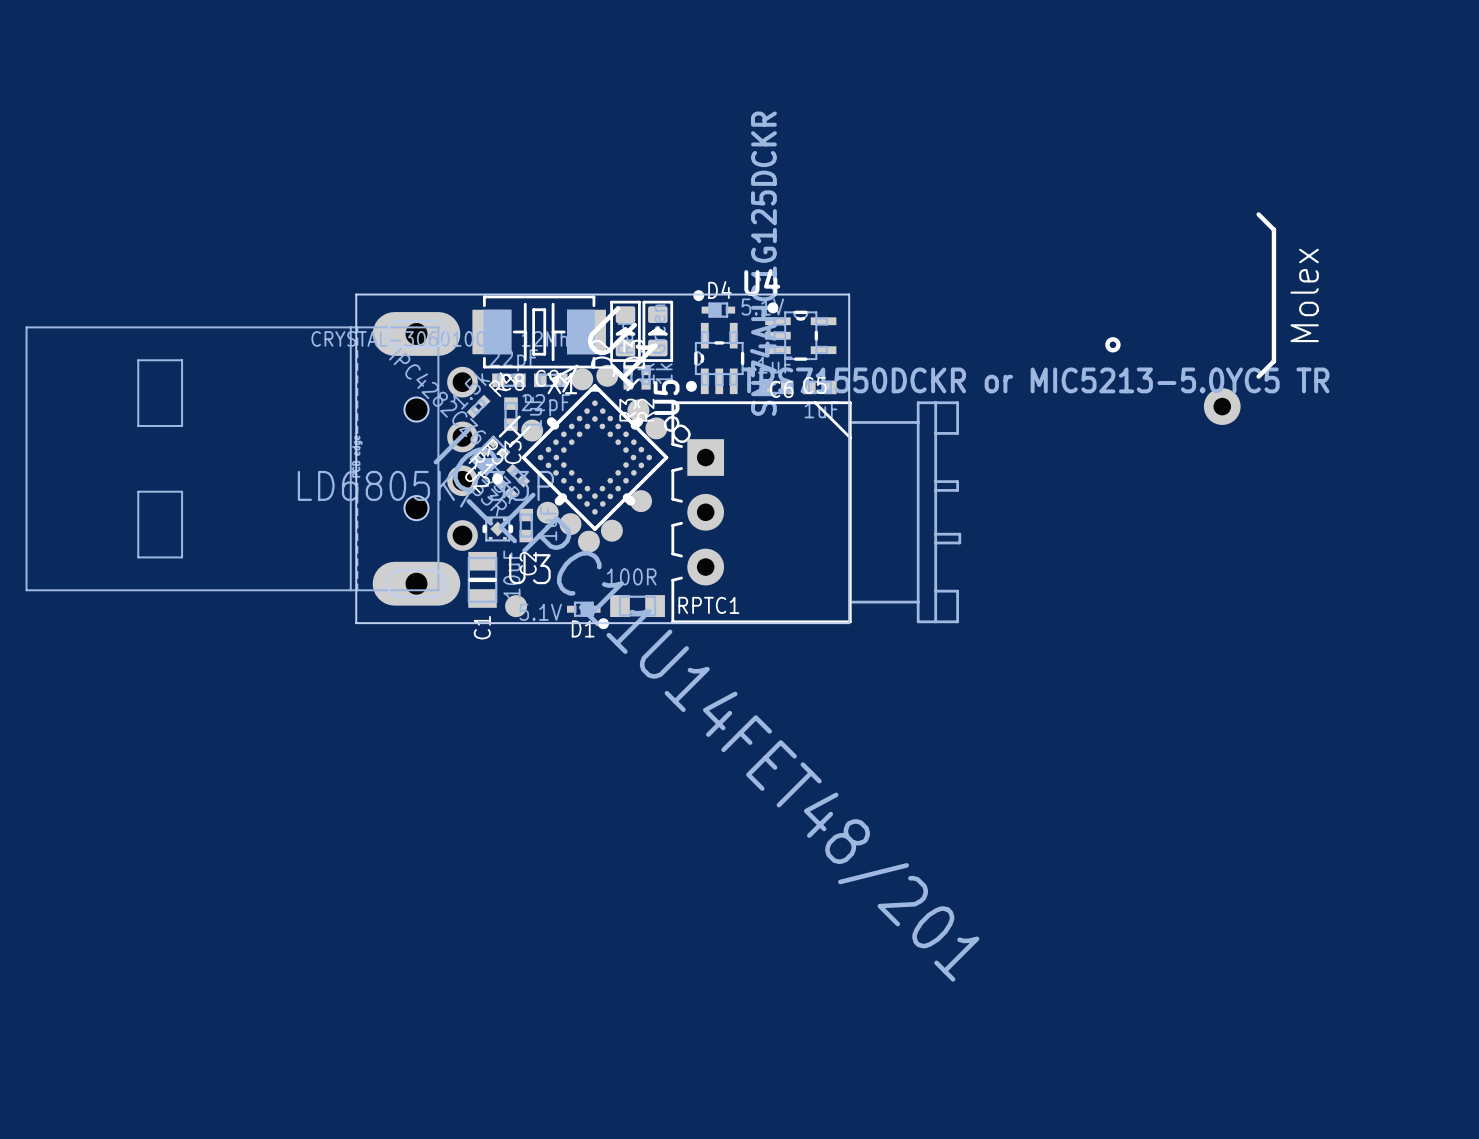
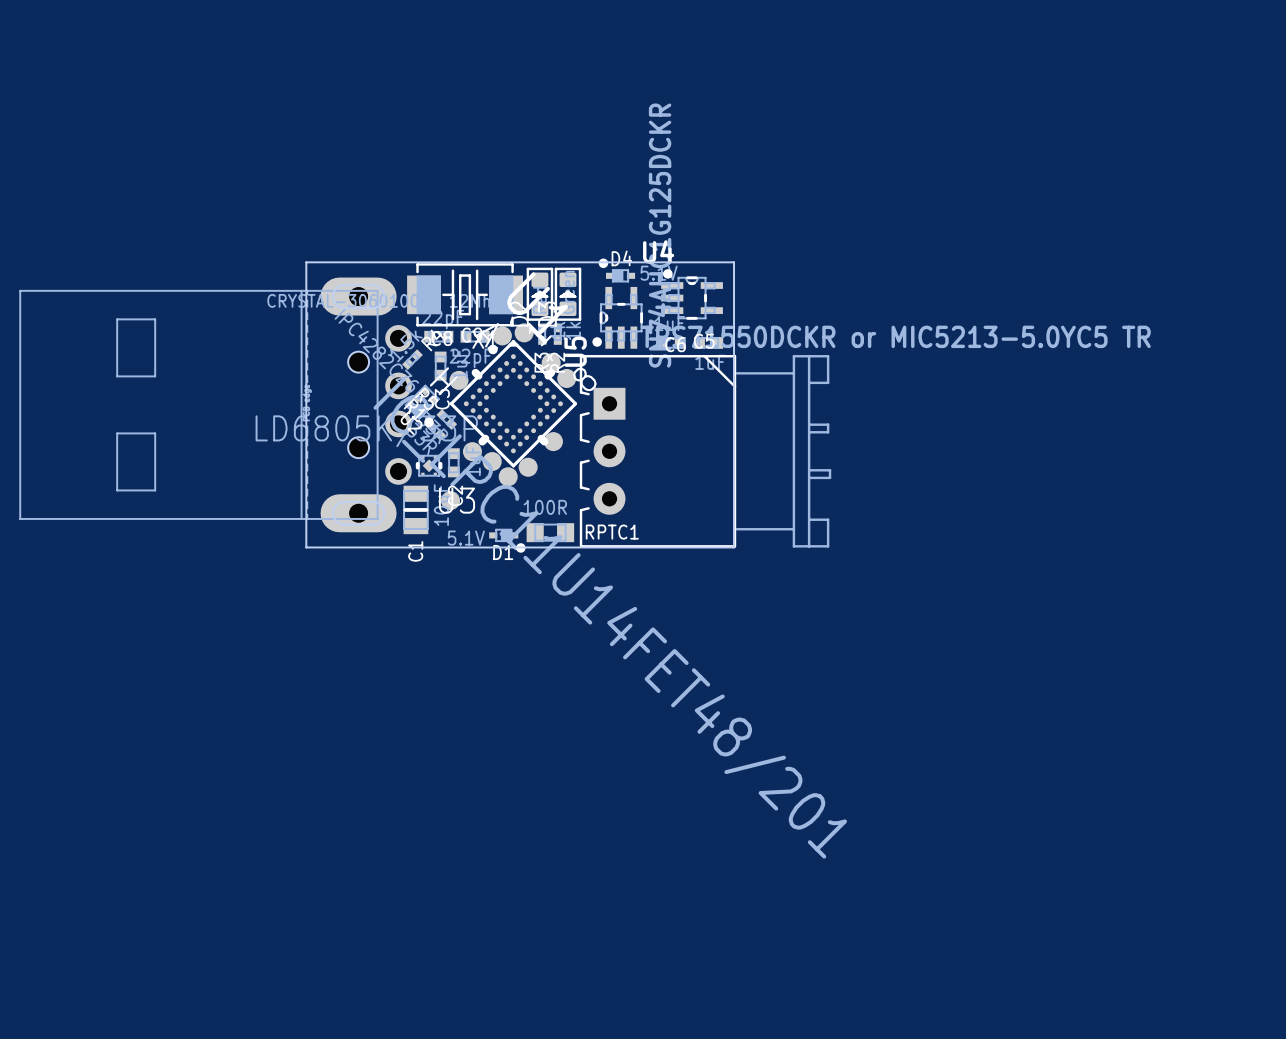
line: (1258, 214) (1273, 229) (1273, 361) (1258, 376) -> none
text: Molex (1304, 295) -> none
drawing: [1105, 337, 1121, 353] -> none
drawing: none -> [488, 344, 498, 355]
part: (1222, 406) -> none
part position: (516, 606) -> (450, 500)

